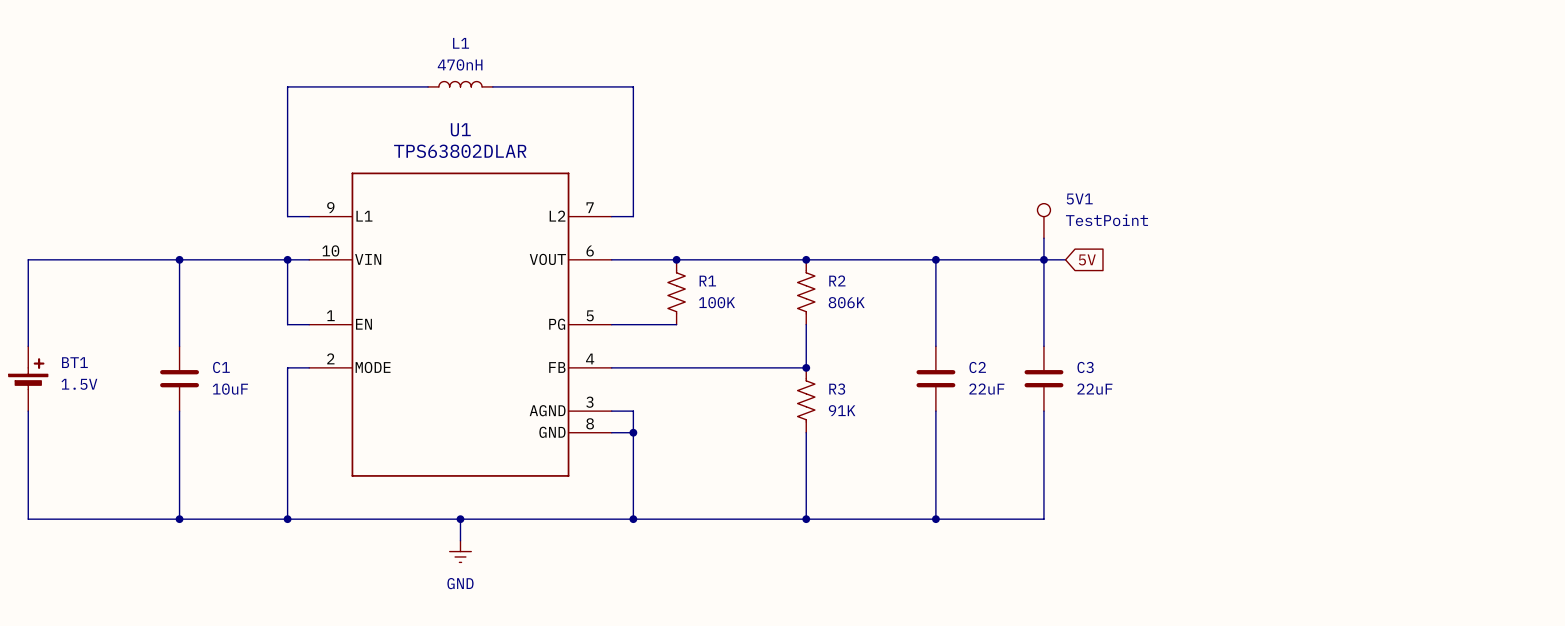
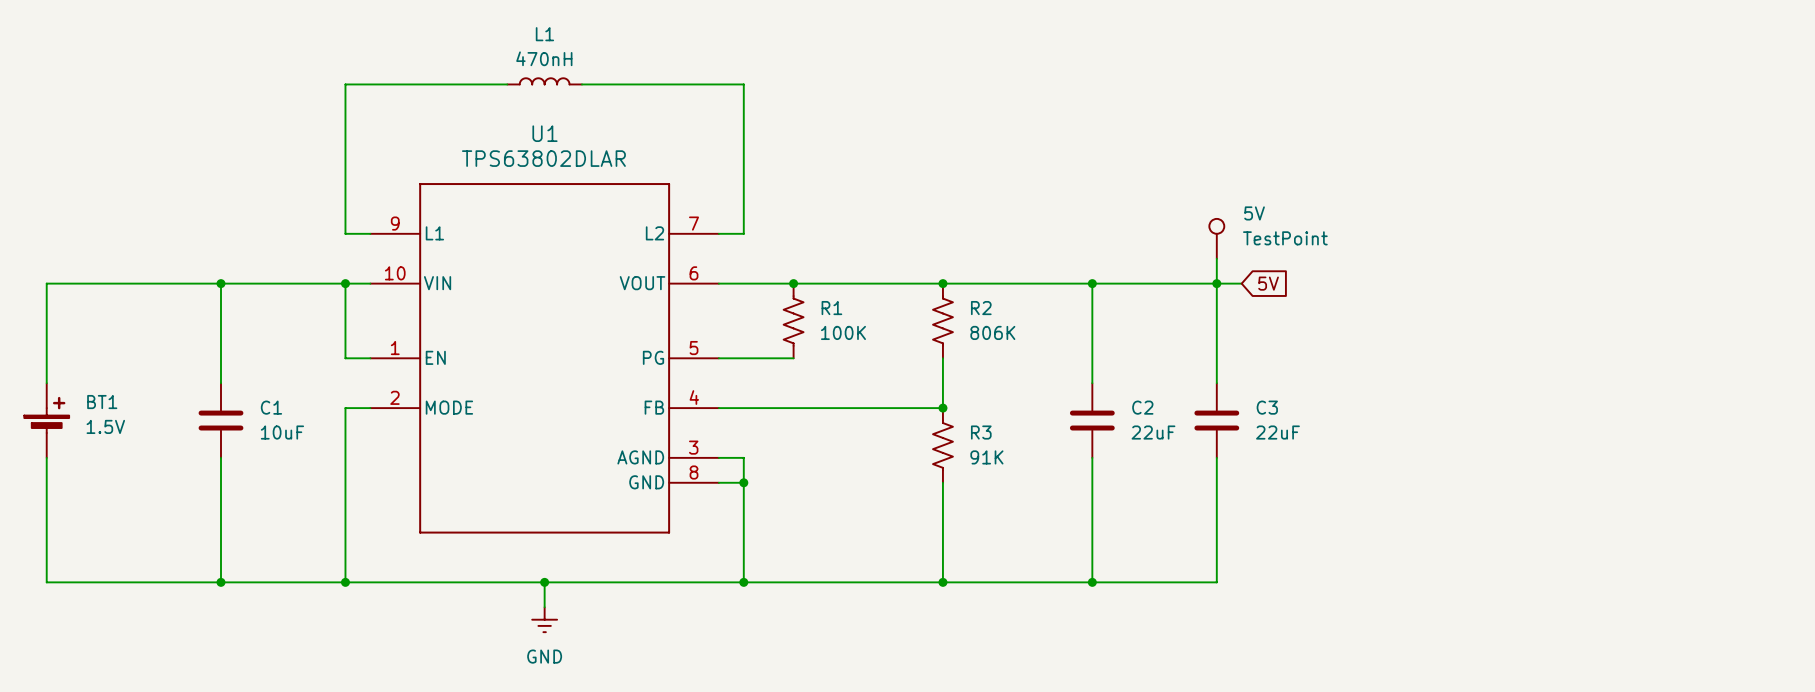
5V1 name: 5V1 (1079, 199) -> 5V (1254, 213)

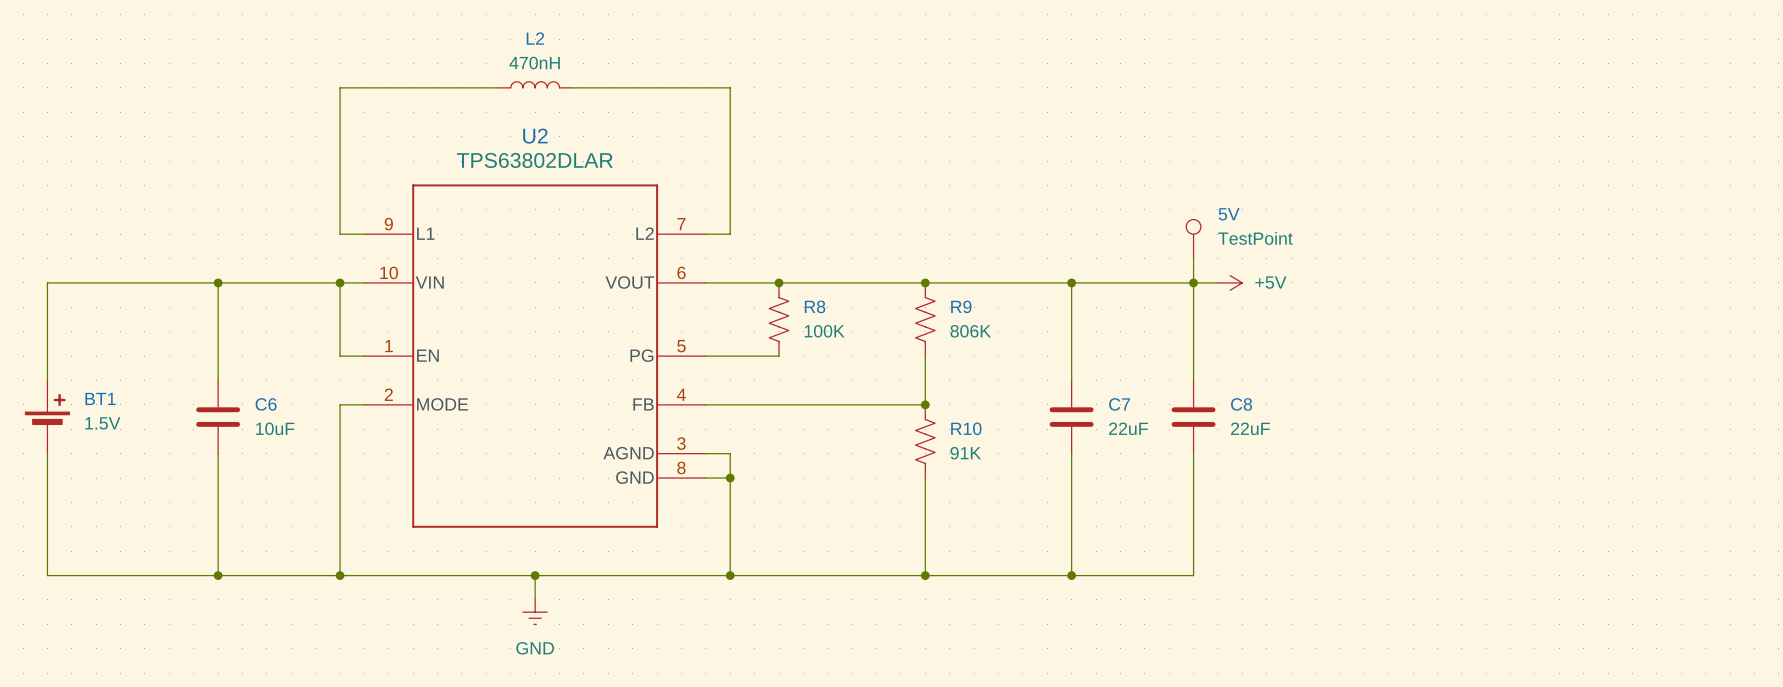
L1 name: L1 (544, 34) -> L2 (535, 38)
U1 name: U1 (544, 133) -> U2 (535, 136)
power symbol: none -> +5V (1230, 282)
global label: 5V (1268, 283) -> none
R1 name: R1 (831, 308) -> R8 (815, 306)
R2 name: R2 (981, 308) -> R9 (961, 306)
C1 name: C1 (271, 407) -> C6 (266, 404)
C2 name: C2 (1142, 407) -> C7 (1119, 404)
C3 name: C3 (1267, 407) -> C8 (1241, 404)
R3 name: R3 (981, 432) -> R10 (966, 428)

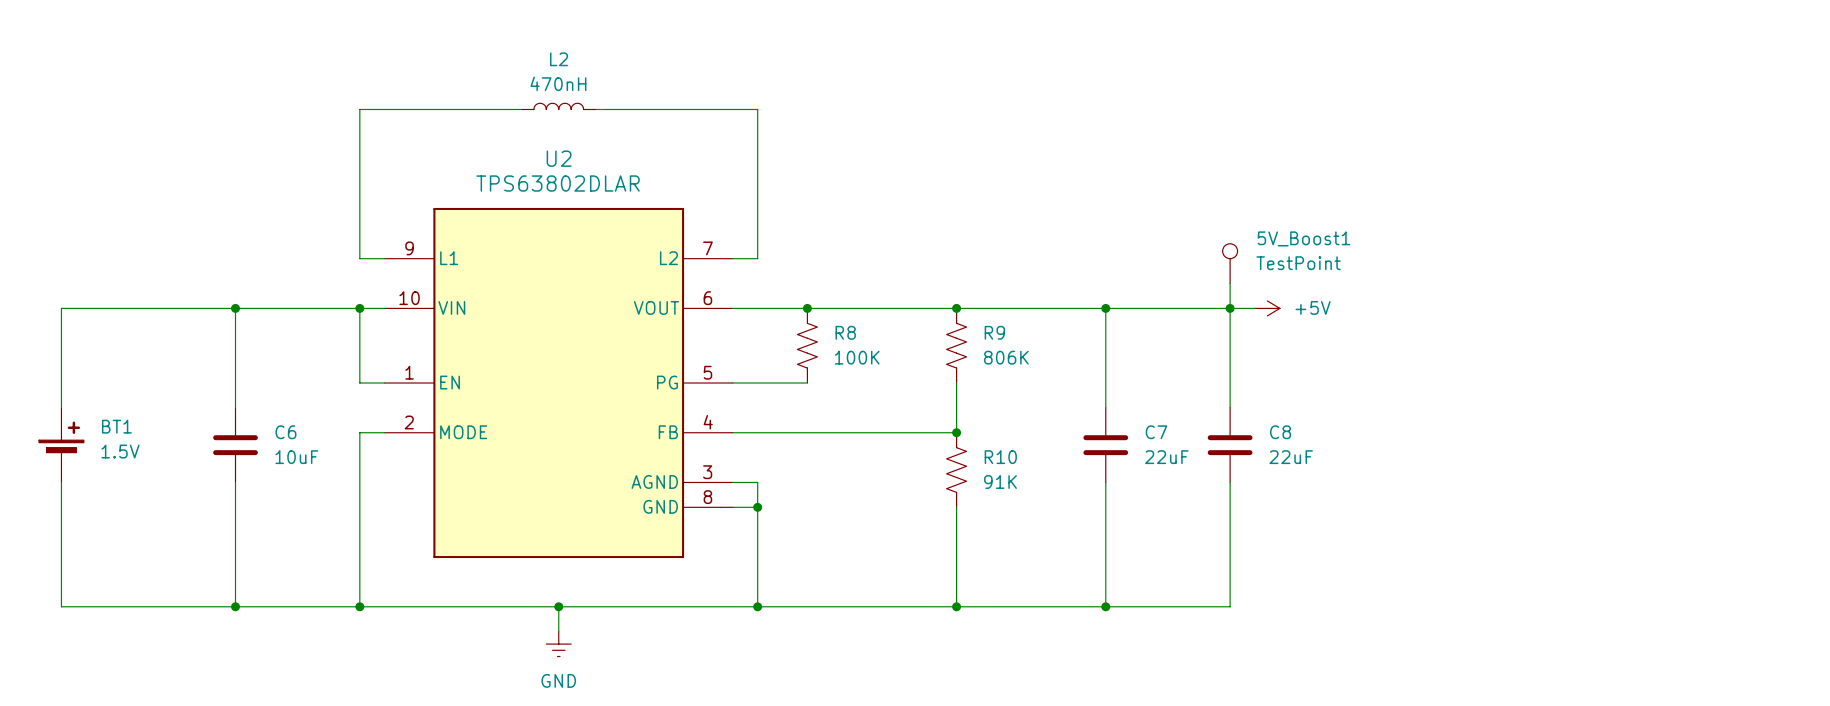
U2 symbol: [364, 184, 706, 528] -> [384, 207, 733, 559]
5V name: 5V (1229, 214) -> 5V_Boost1 (1303, 238)

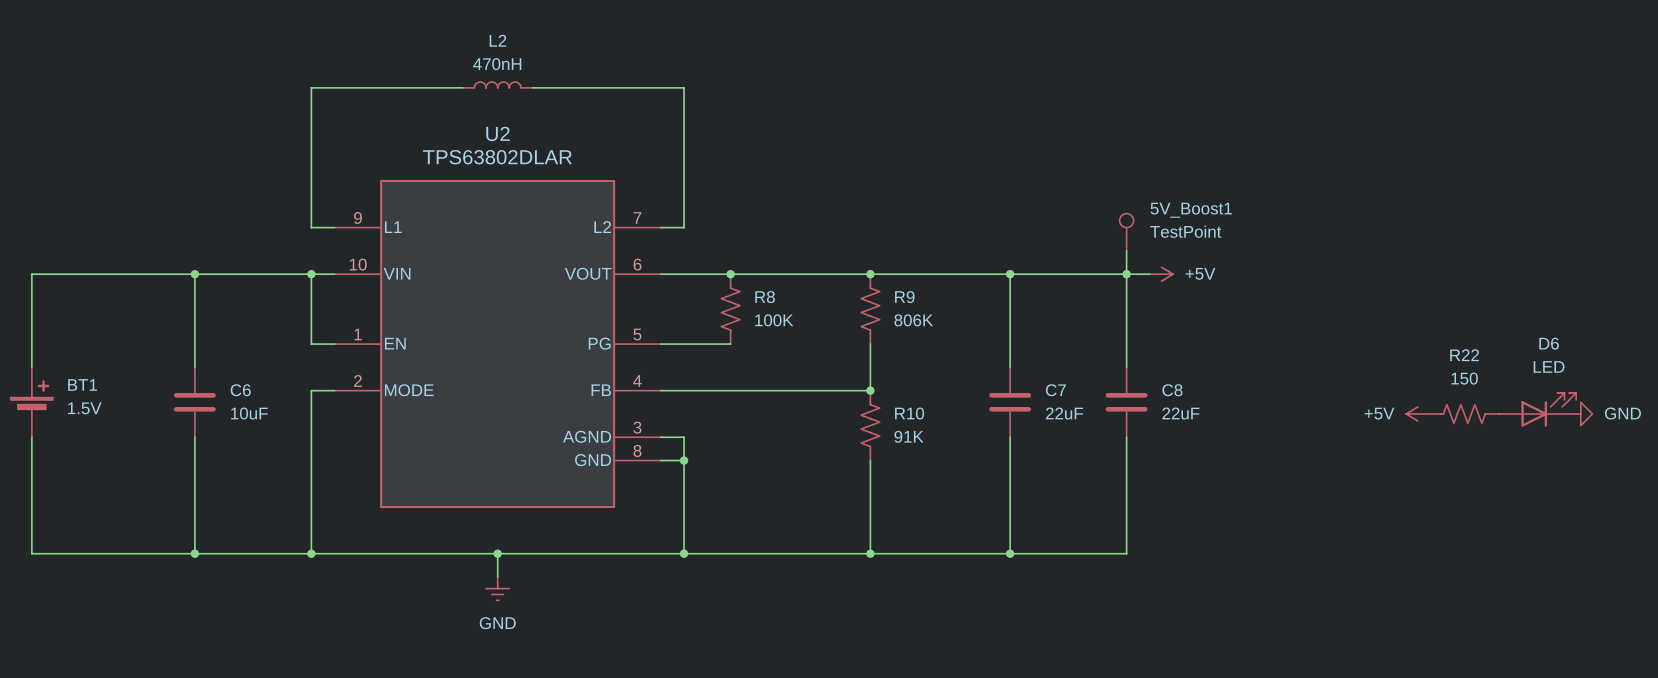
D6: none -> LED (1537, 409)
power symbol: none -> +5V (1417, 413)
R22: none -> 150 (1464, 413)
power symbol: none -> GND (1580, 413)

